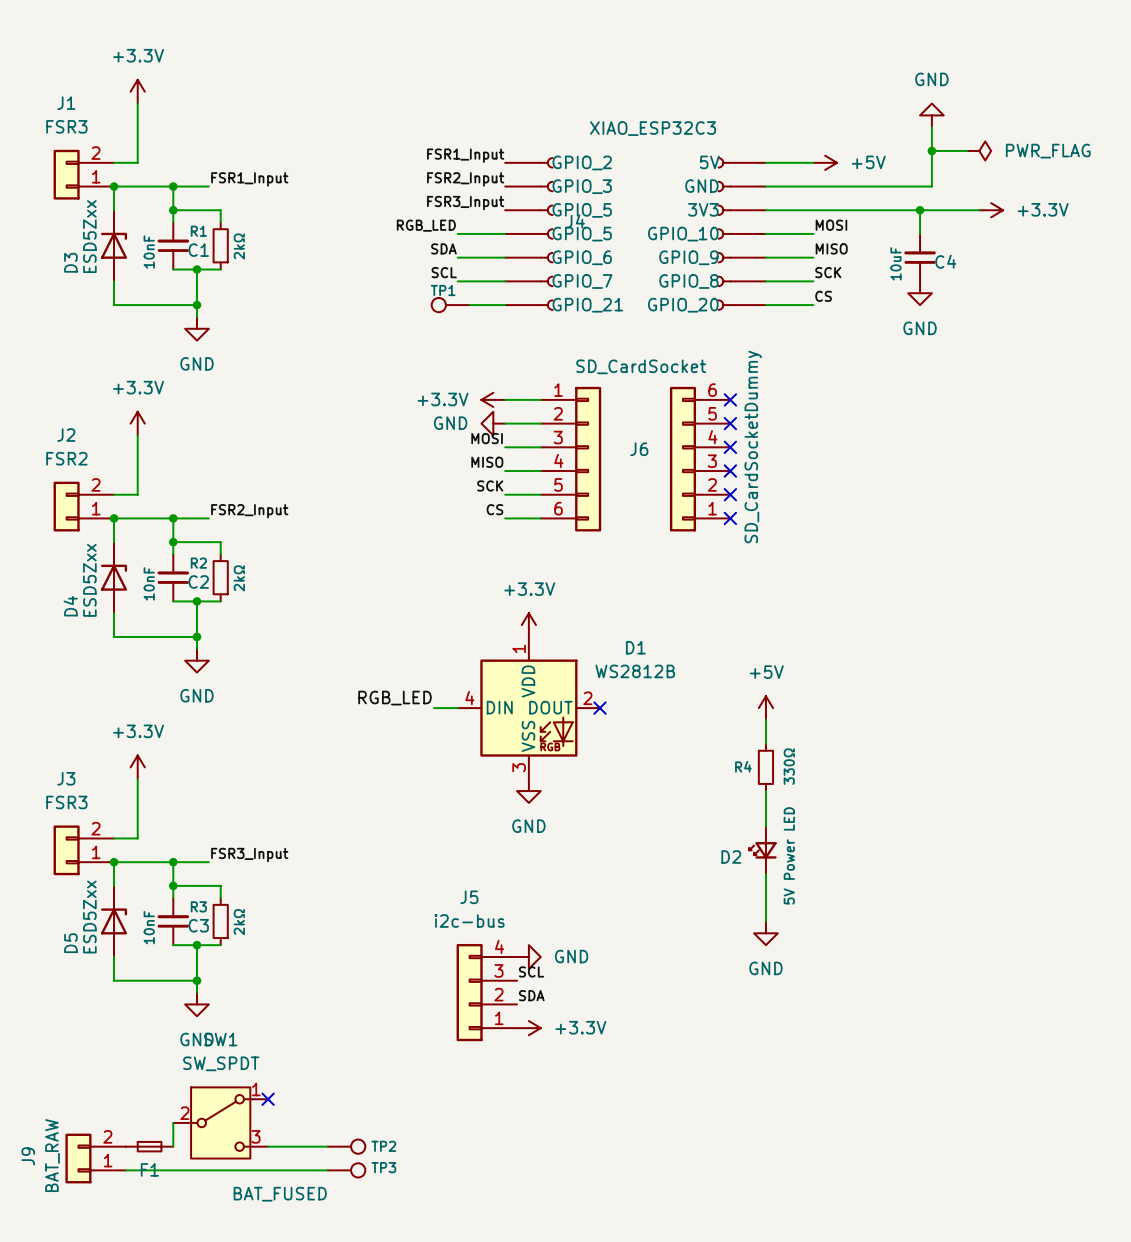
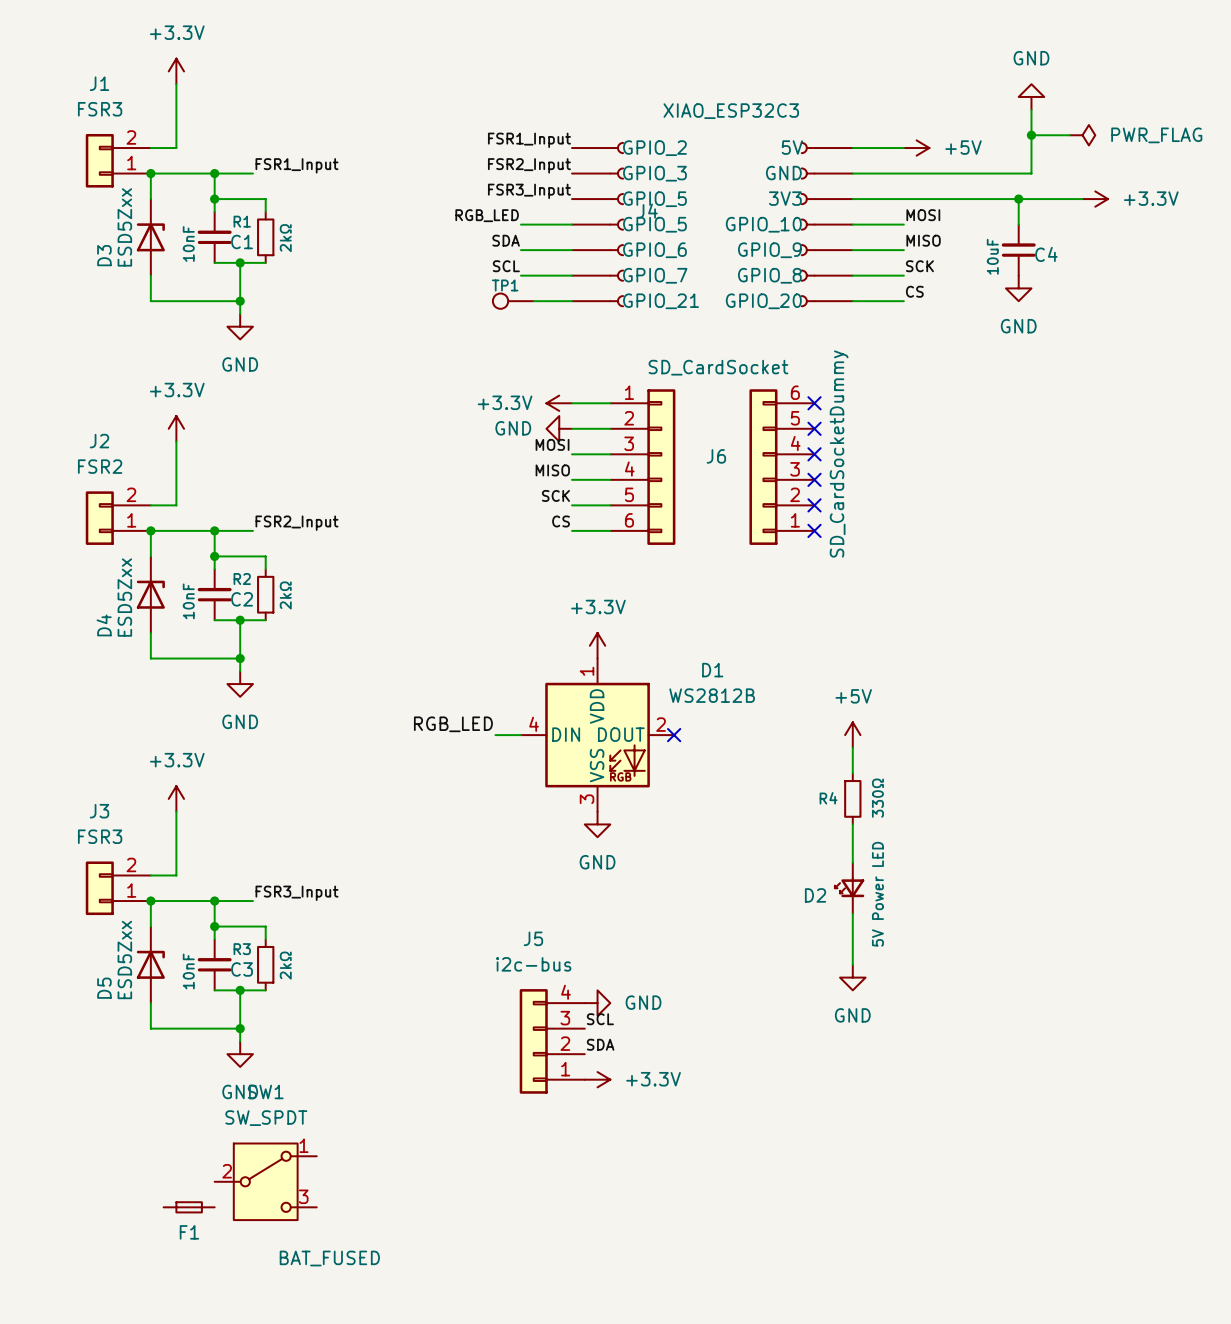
no-connect mark: (268, 1099) -> none
wire: (173, 1122) (173, 1146) -> none
wire: (268, 1146) (327, 1146) -> none
TP2: (346, 1146) -> none
J9: BAT_RAW (95, 1158) -> none
wire: (125, 1170) (327, 1170) -> none
TP3: (346, 1170) -> none

